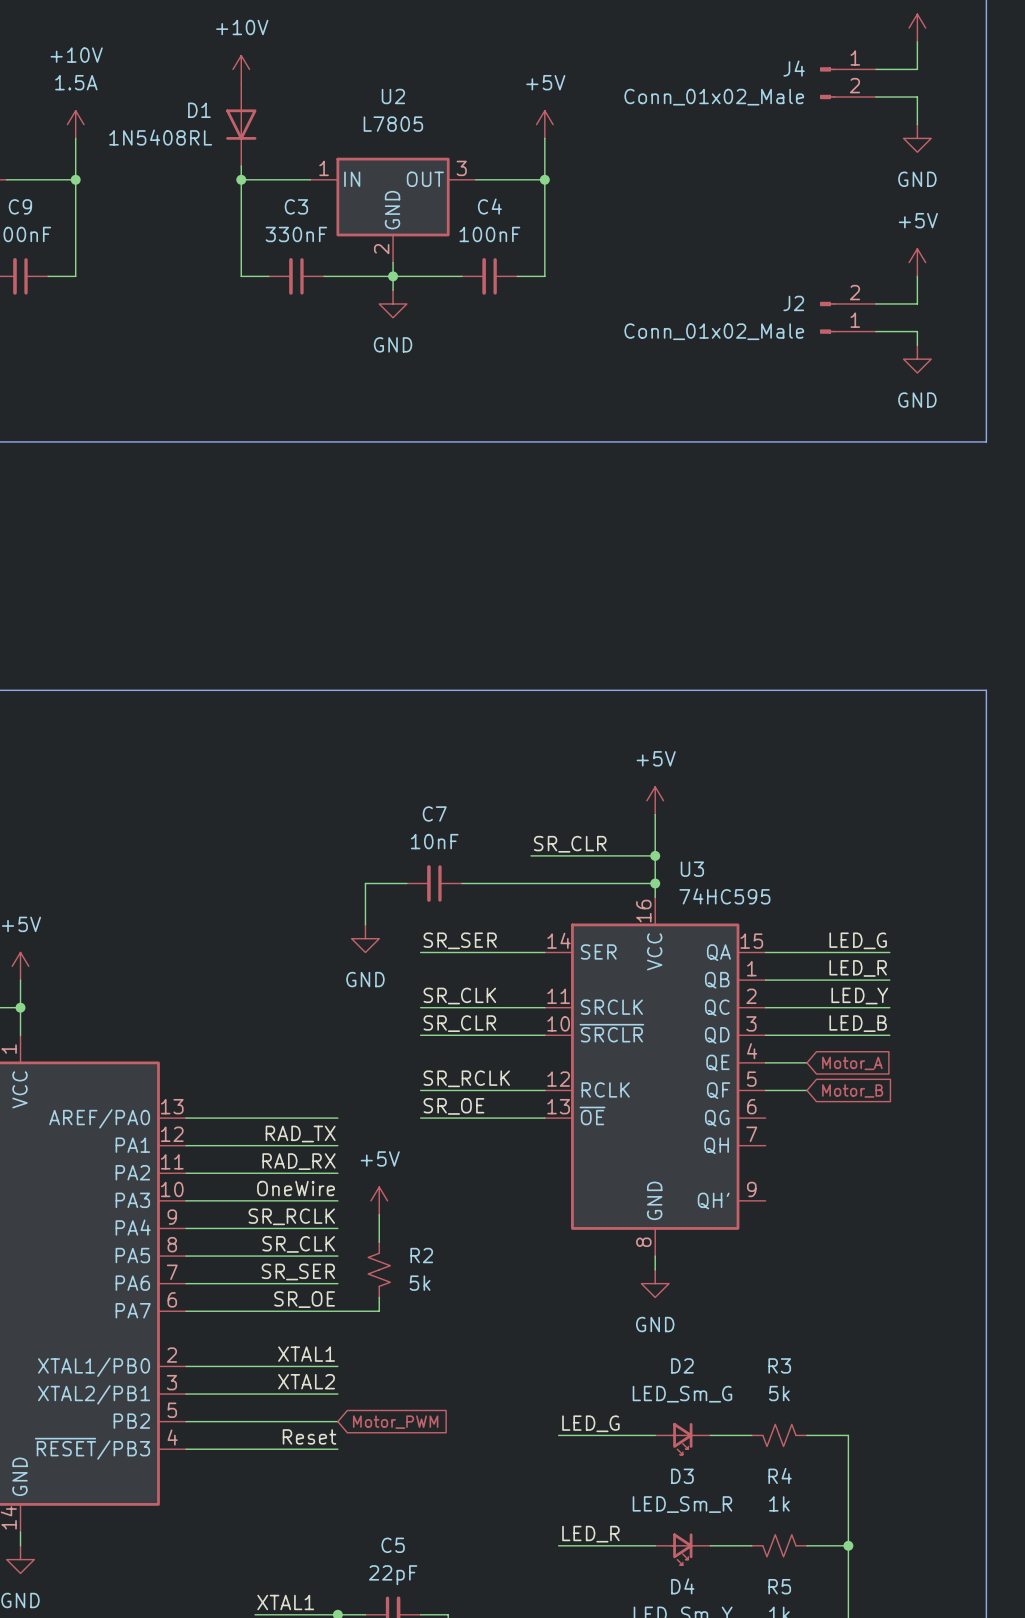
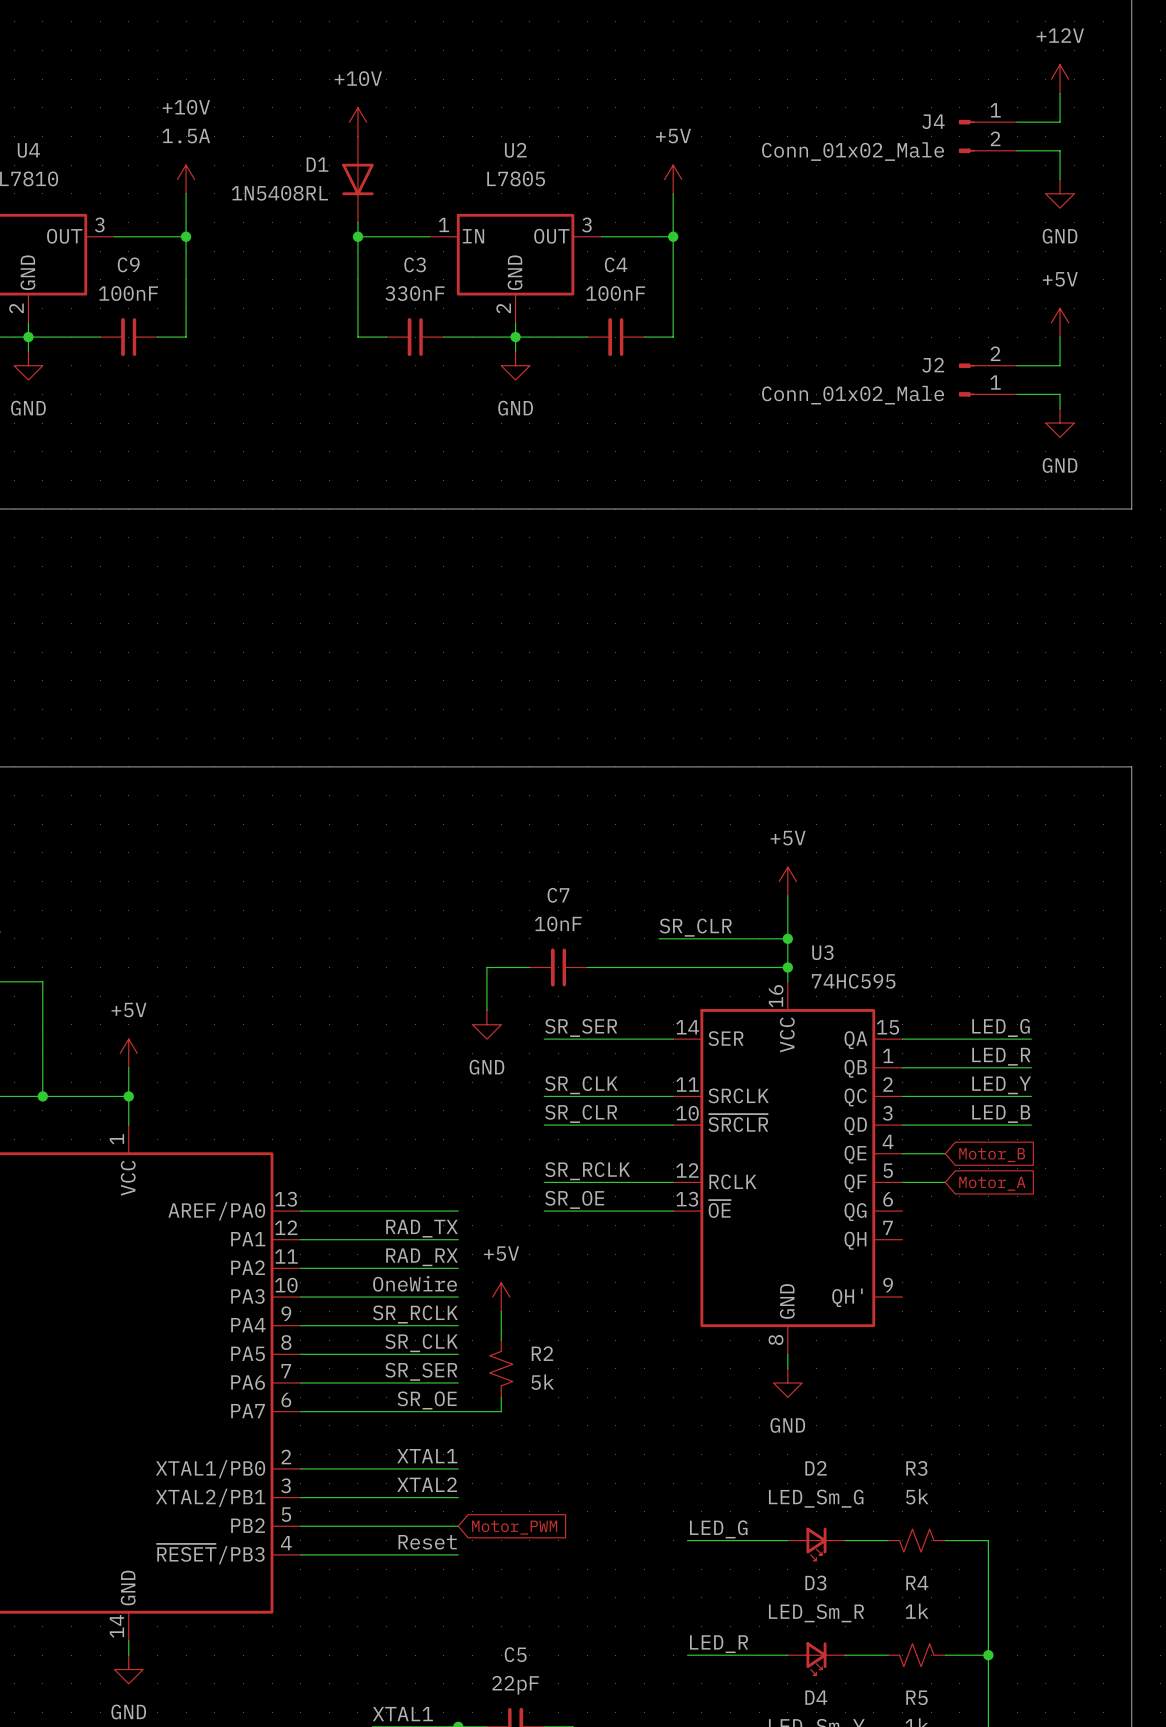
global label: Motor_A (852, 1063) -> Motor_B (992, 1155)
global label: Motor_B (852, 1090) -> Motor_A (992, 1183)

